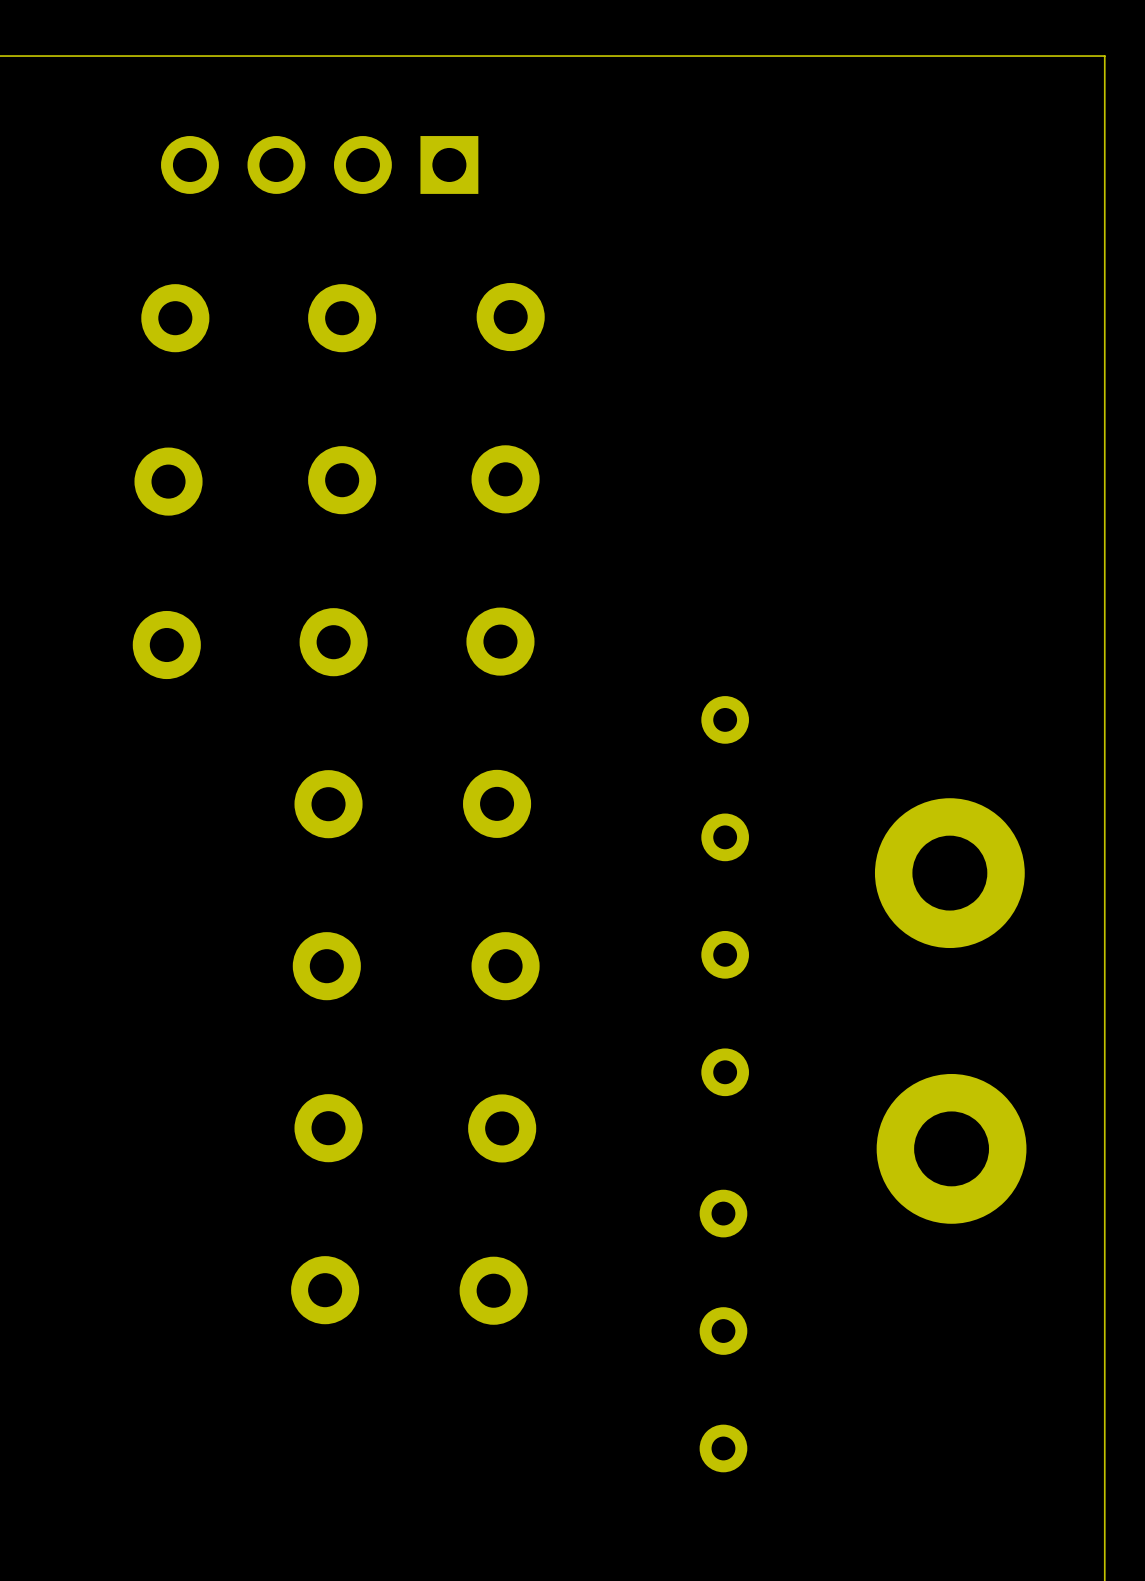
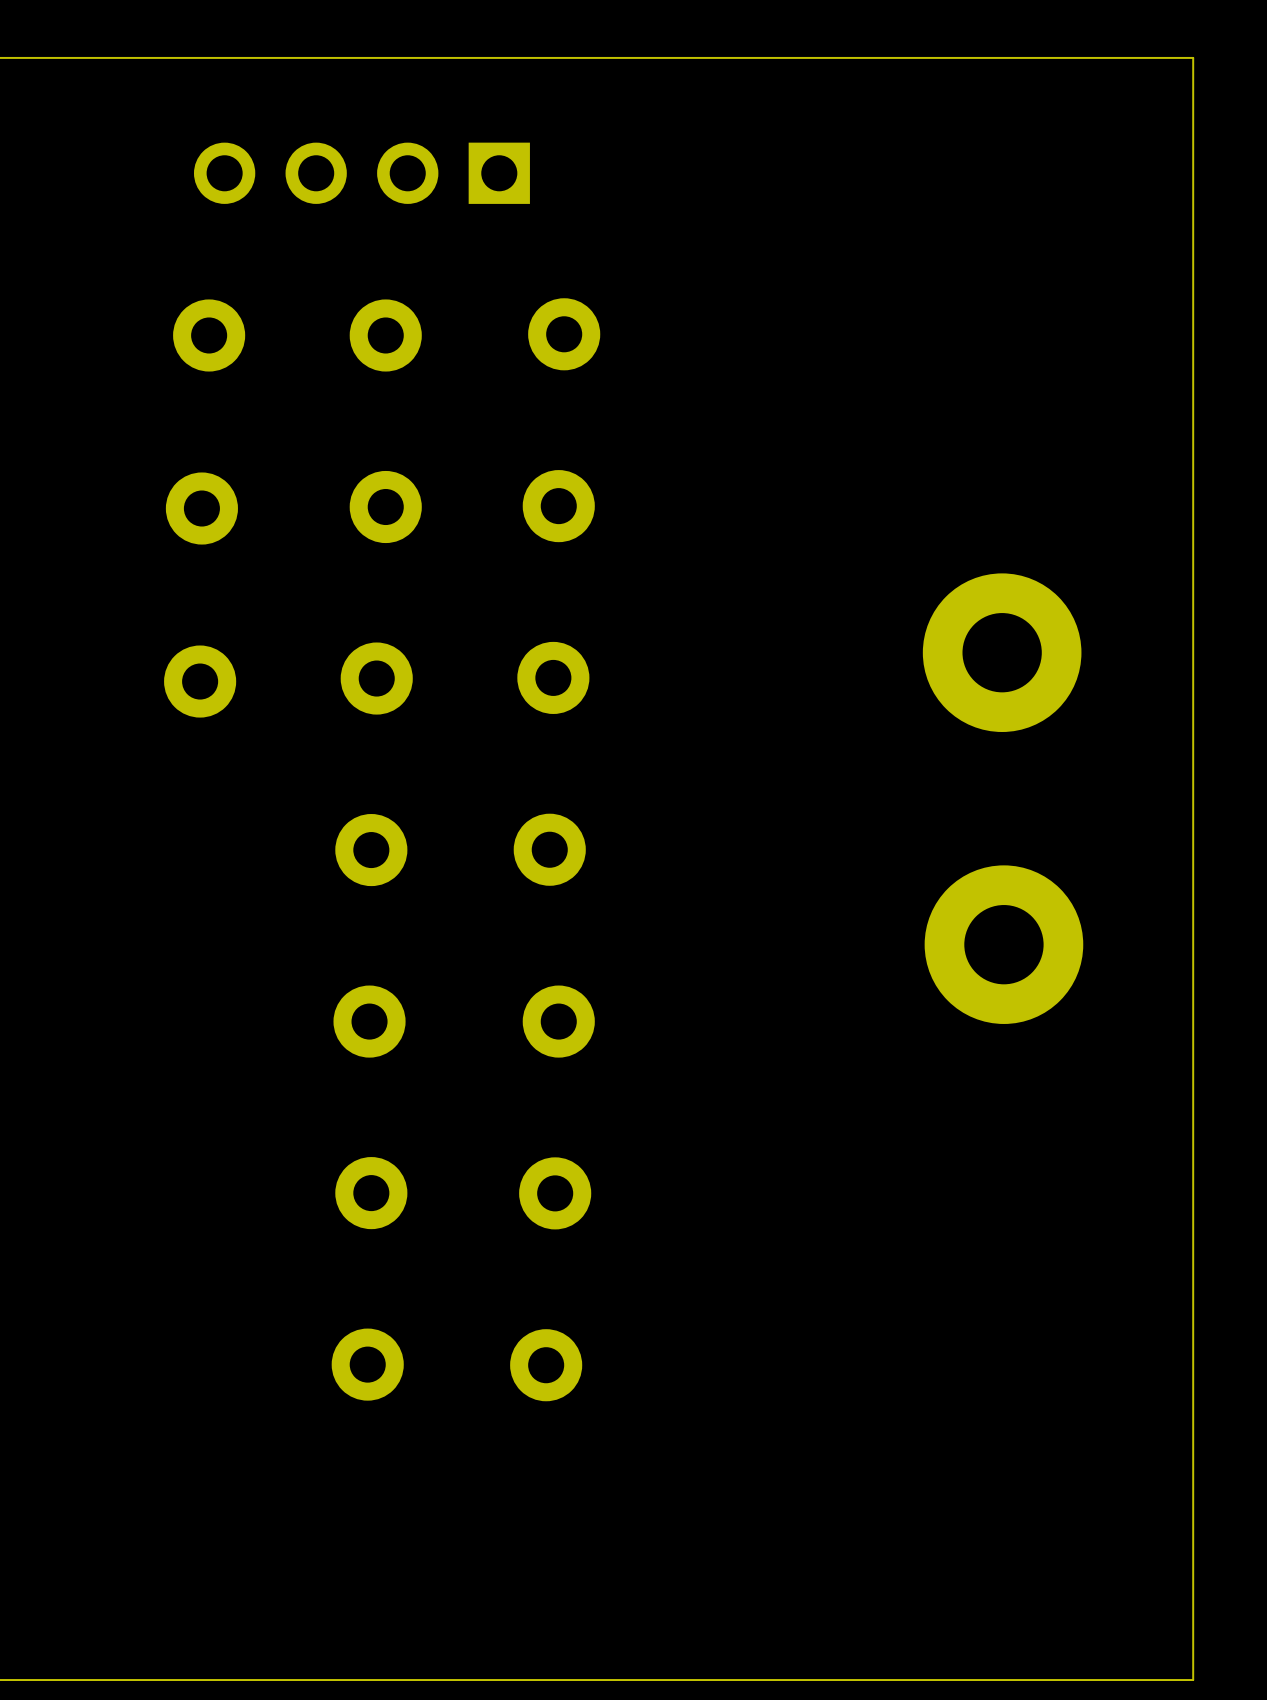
part: (725, 719) -> none
part: (725, 837) -> none
part position: (949, 873) -> (1003, 944)
part: (725, 954) -> none
part: (725, 1072) -> none
part position: (951, 1148) -> (1002, 652)
part: (723, 1213) -> none
part: (723, 1331) -> none
part: (723, 1448) -> none

